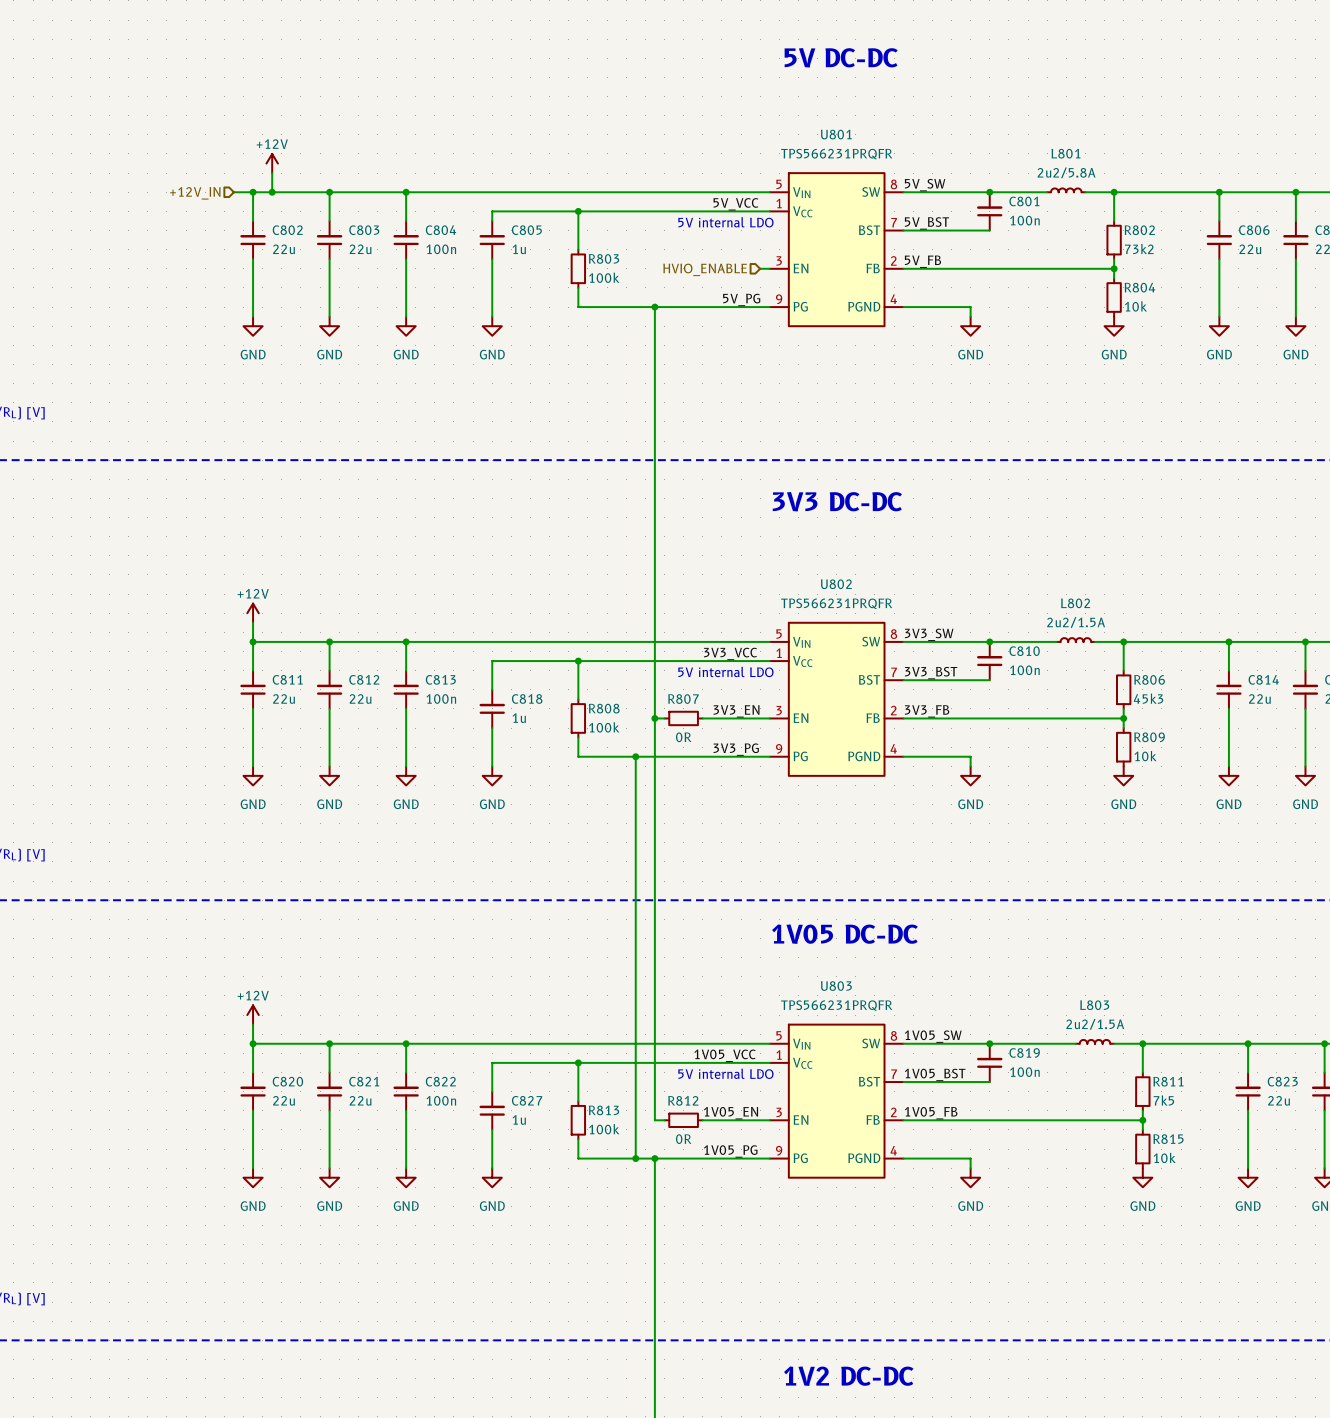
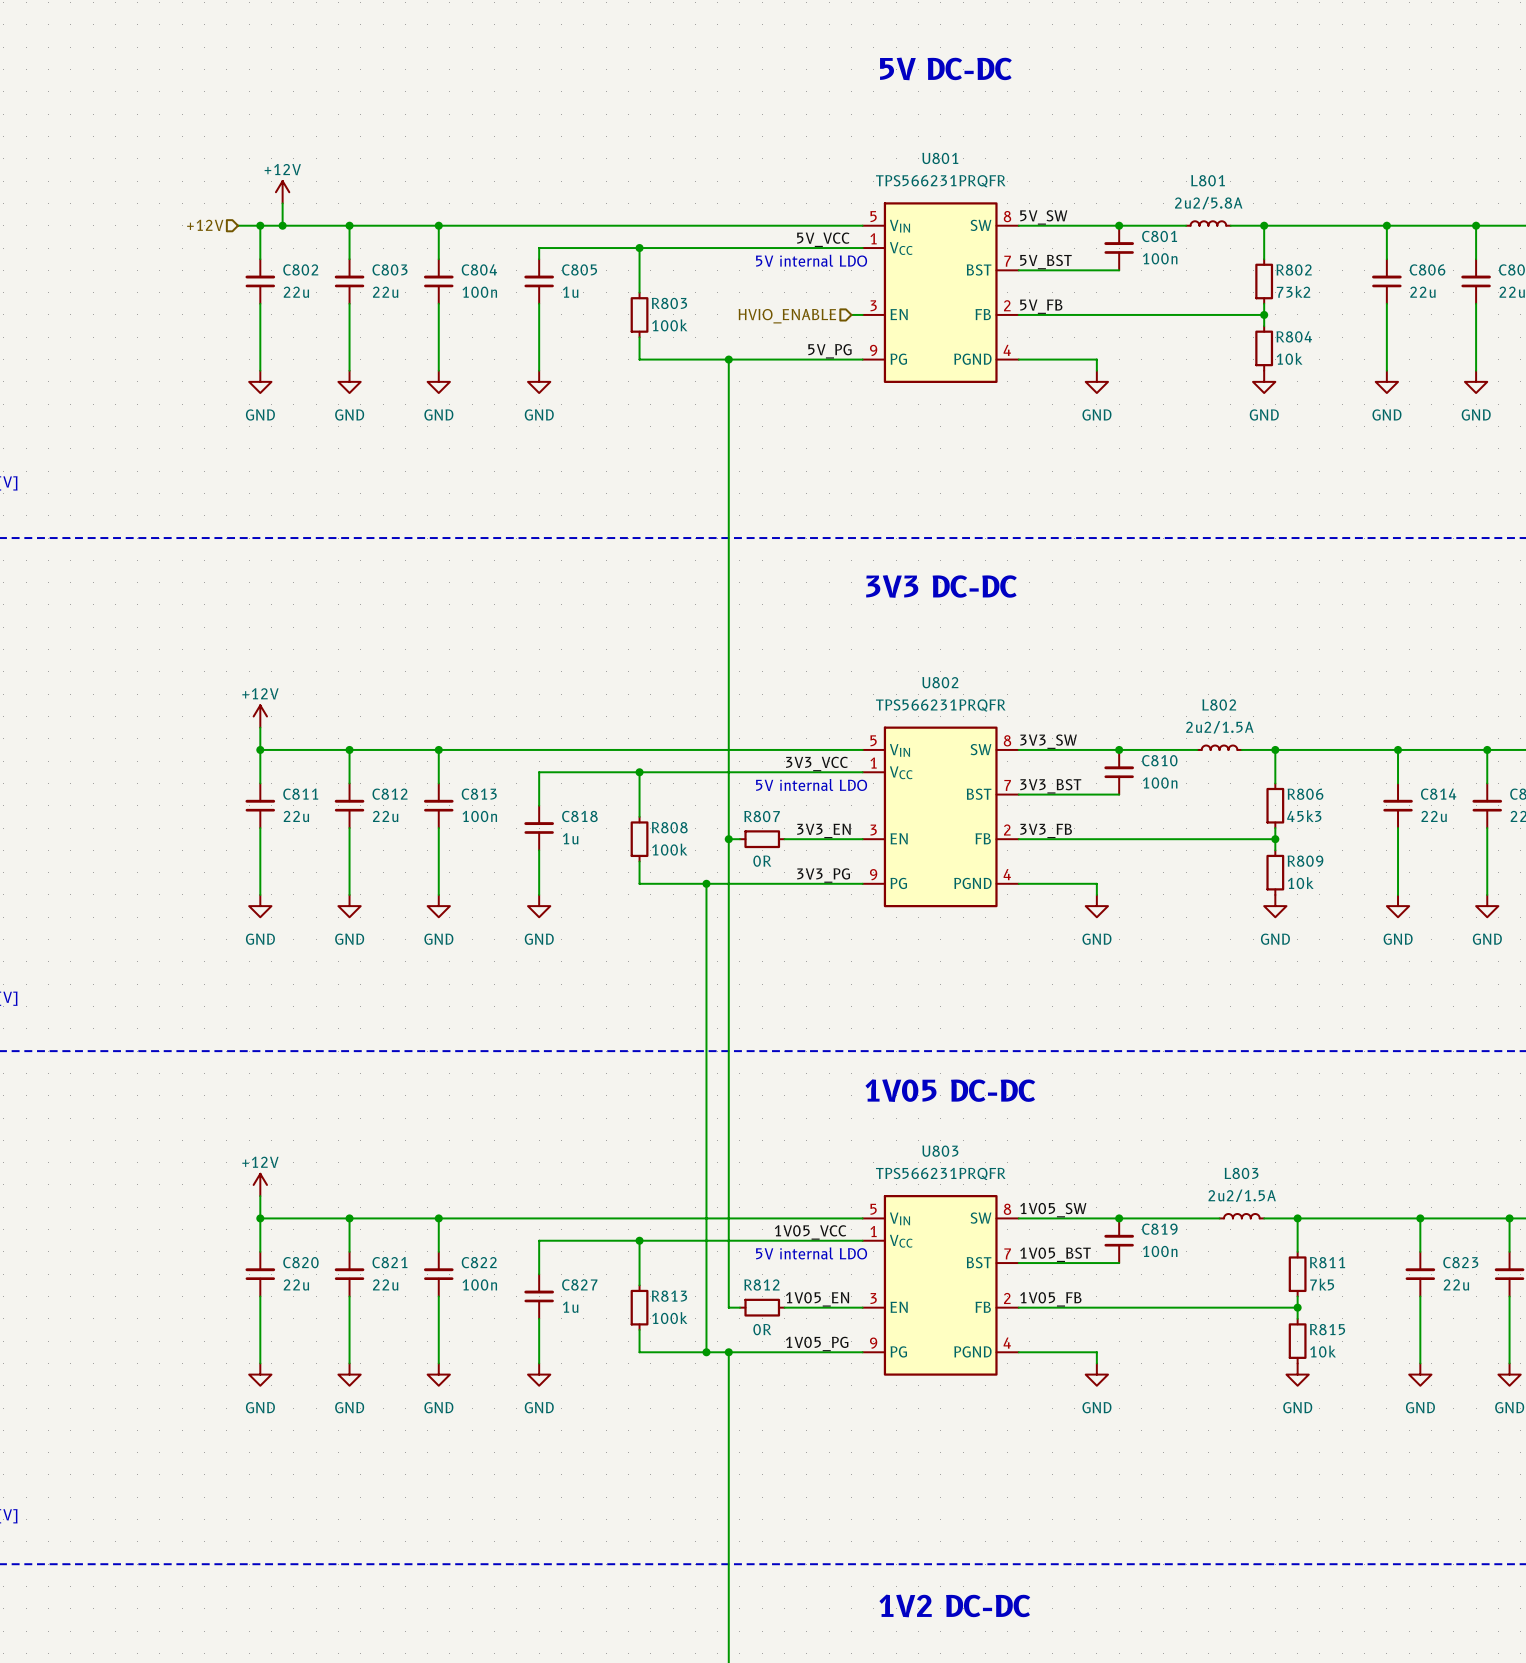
hierarchical label: +12V_IN (195, 193) -> +12V (205, 225)

